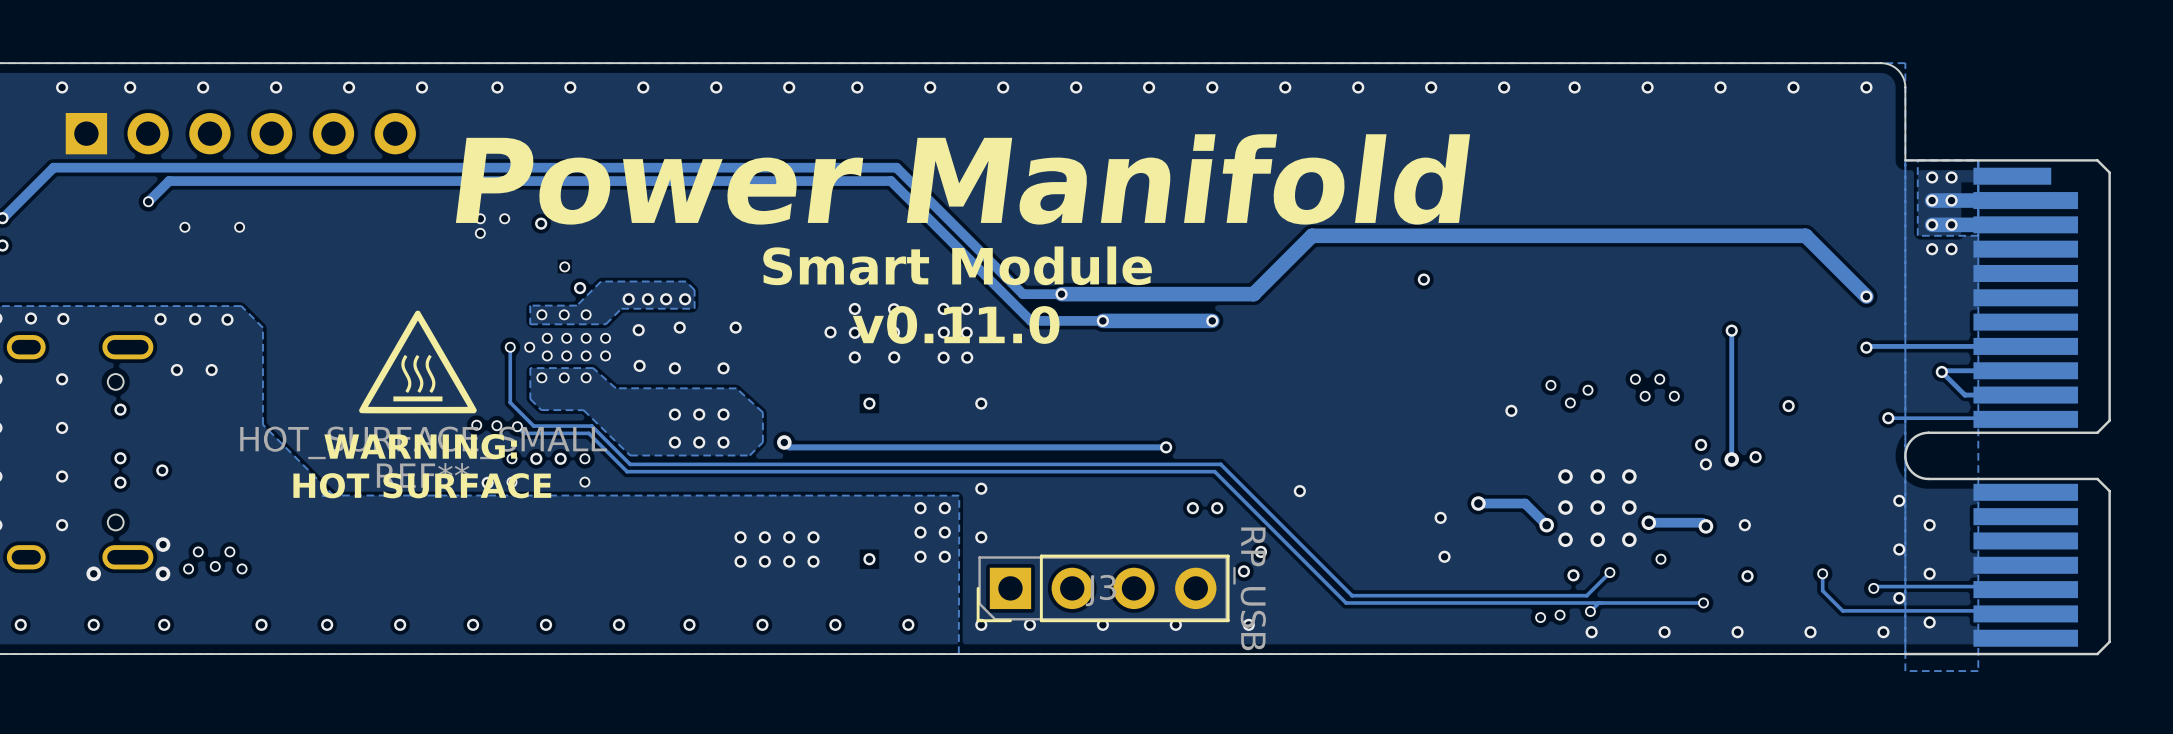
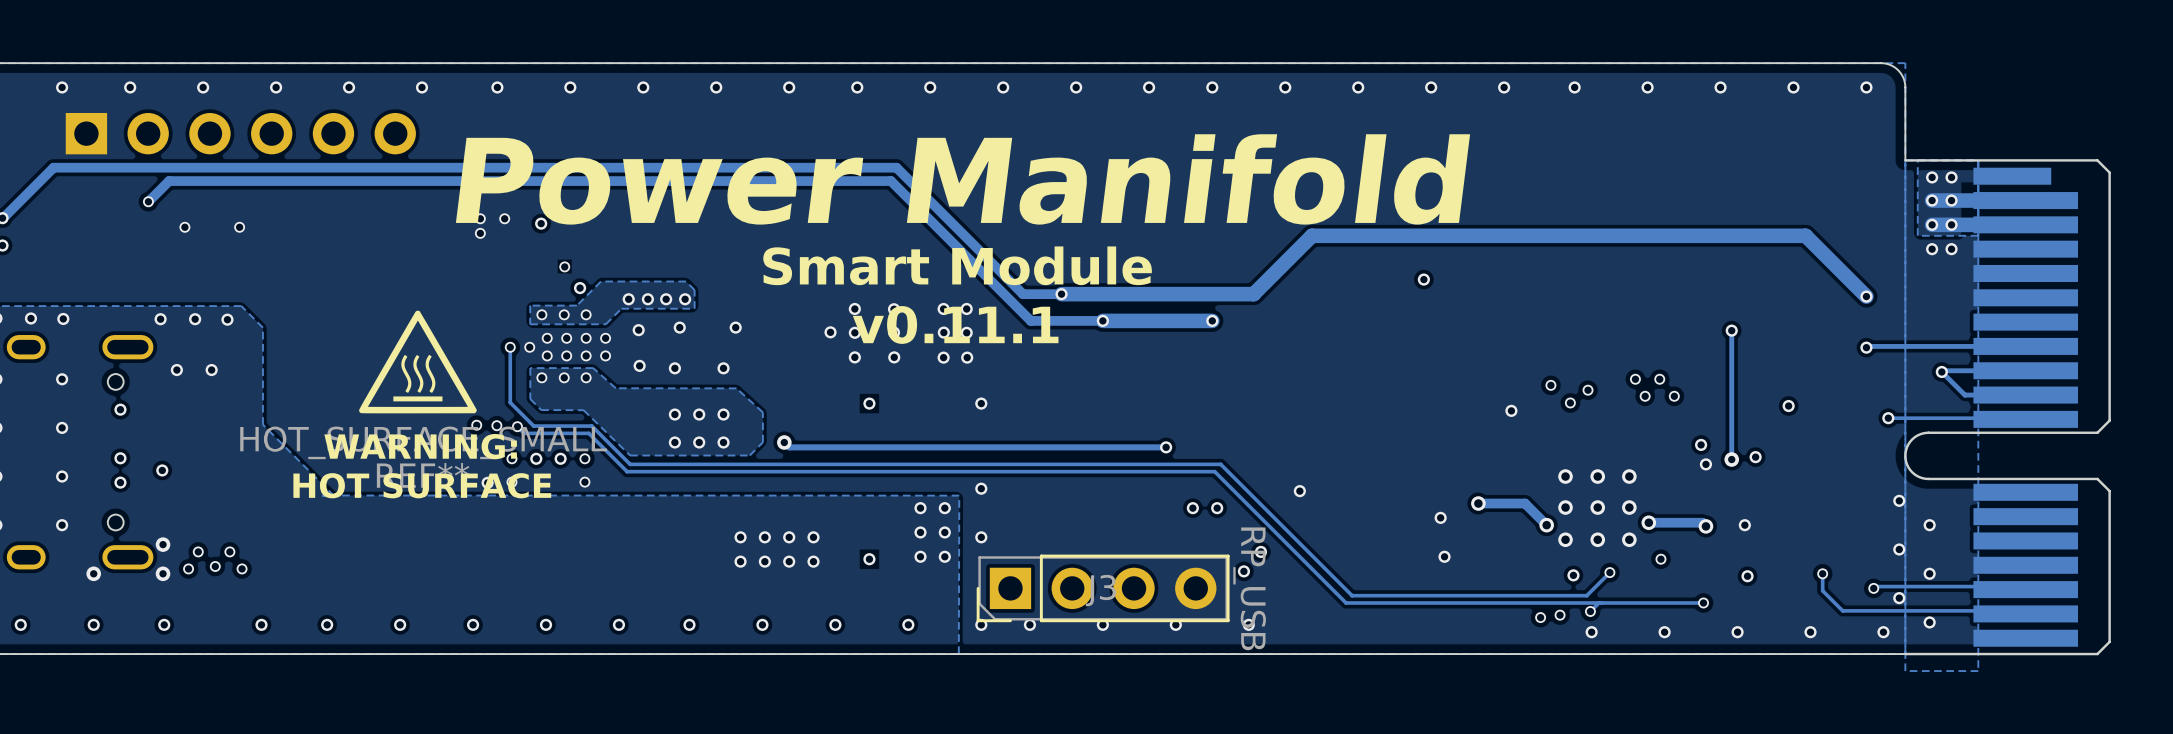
text: v0.11.0 (956, 324) -> v0.11.1 (955, 324)

